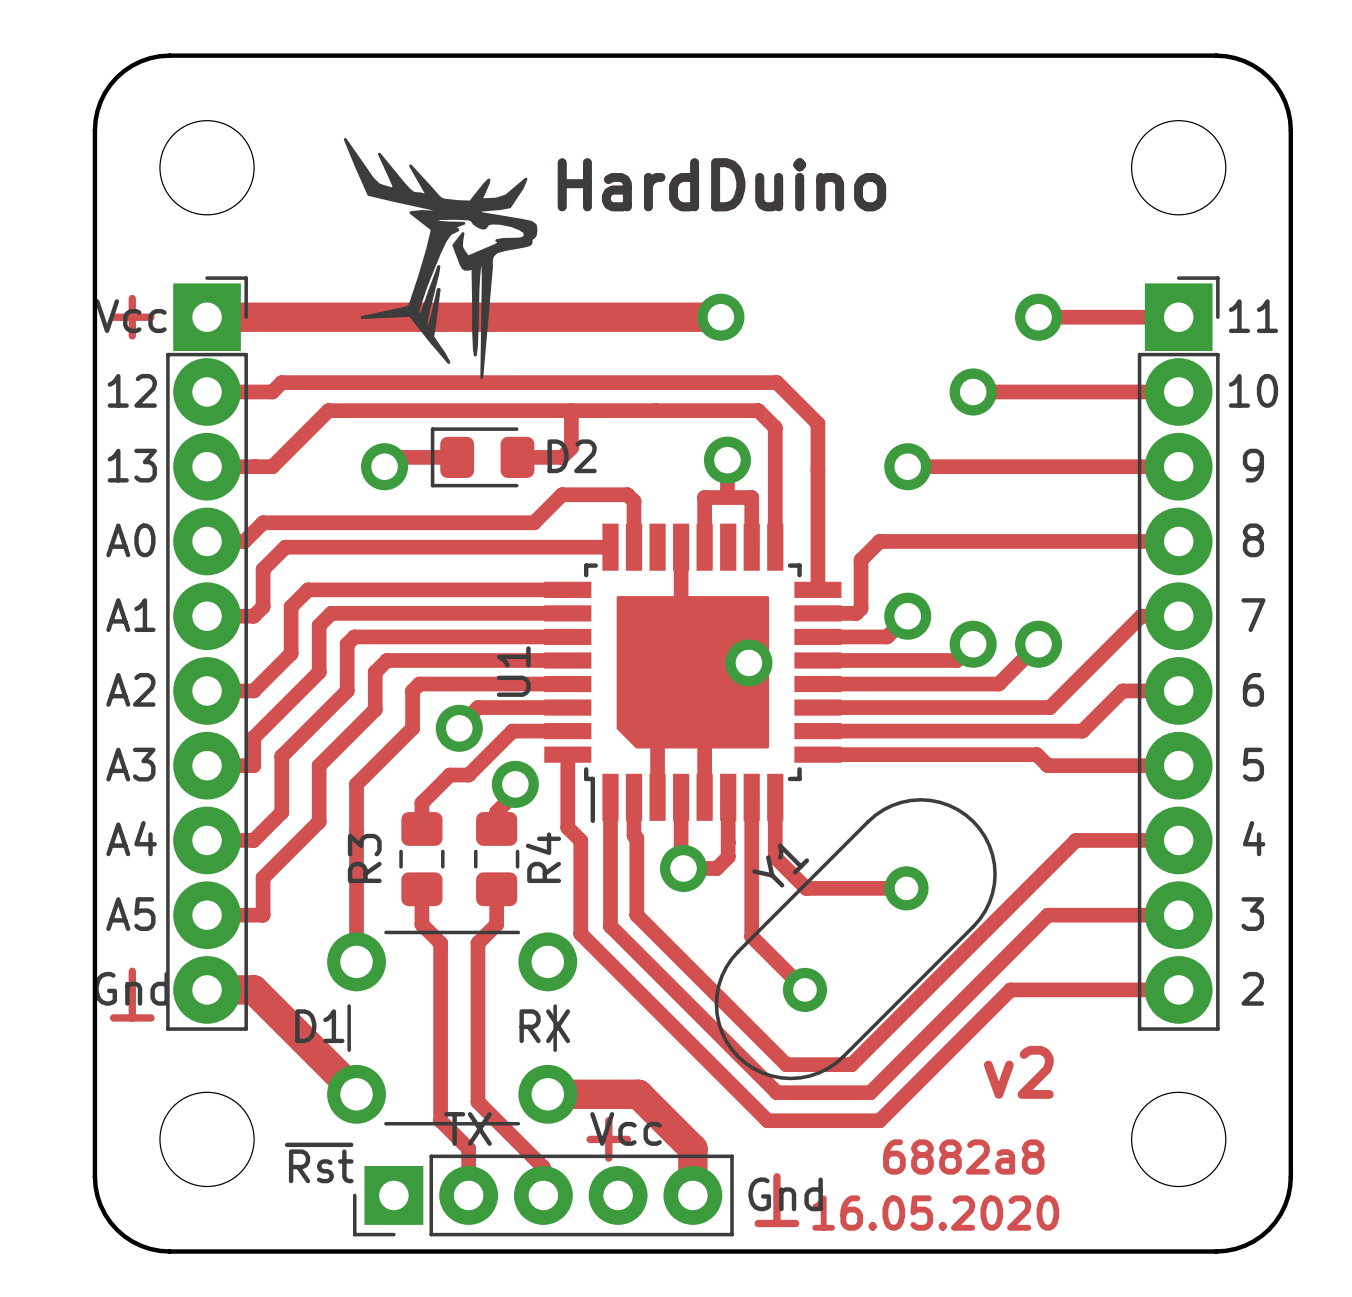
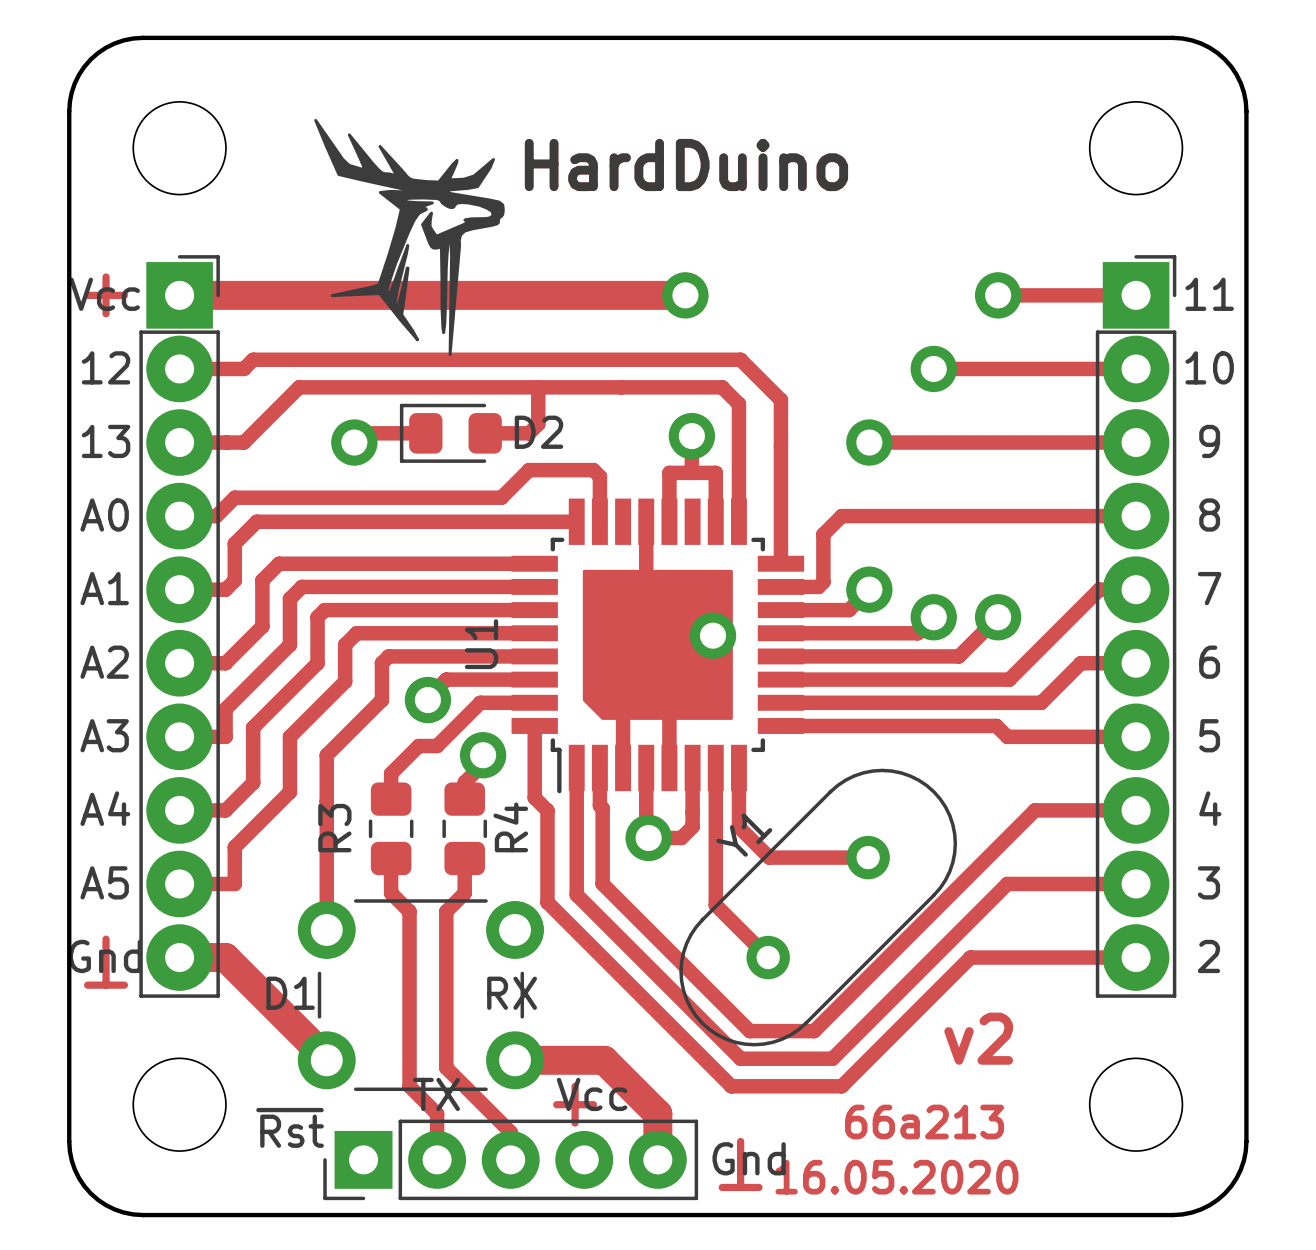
text: 6882a8 (963, 1156) -> 66a213 (924, 1122)

